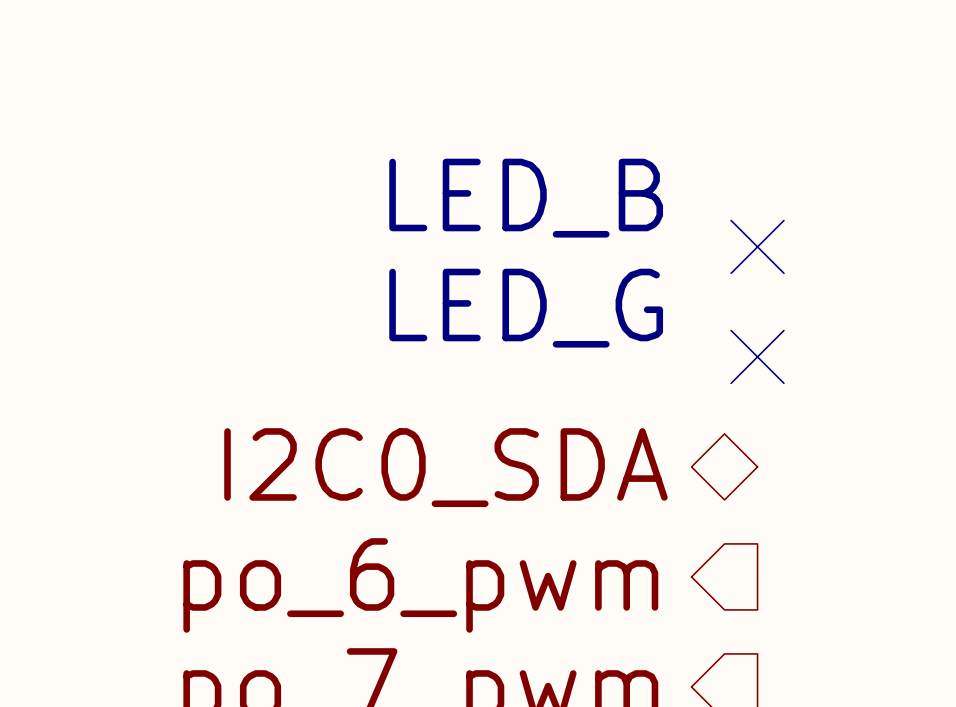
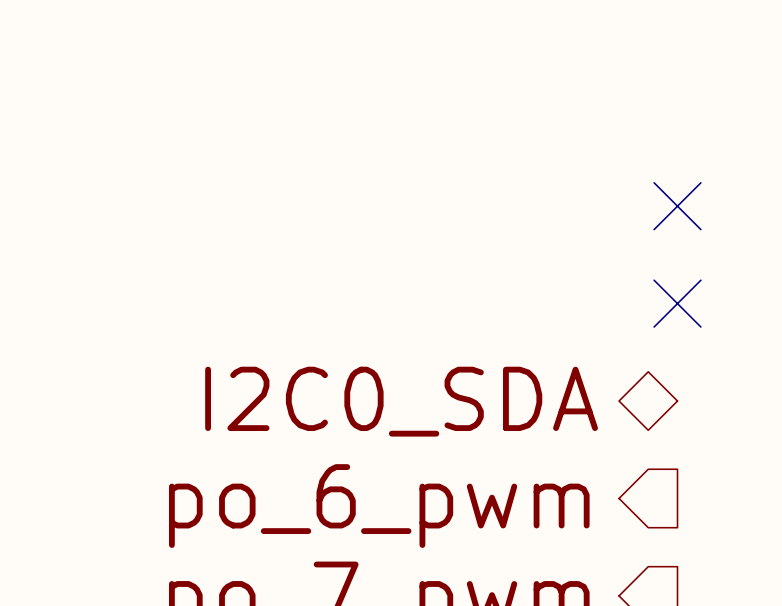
text: LED_B (526, 198) -> none
text: LED_G (526, 308) -> none

